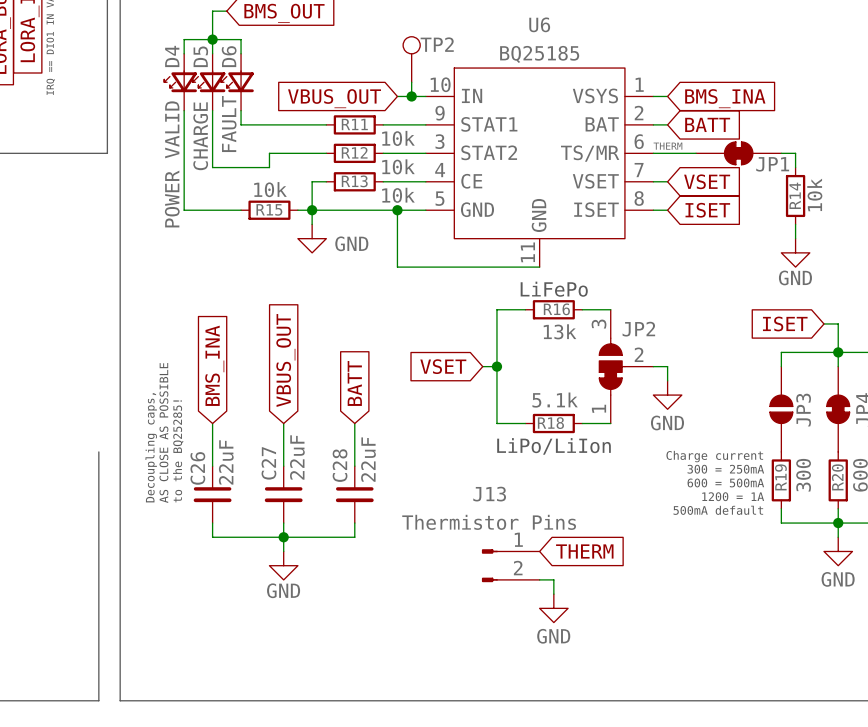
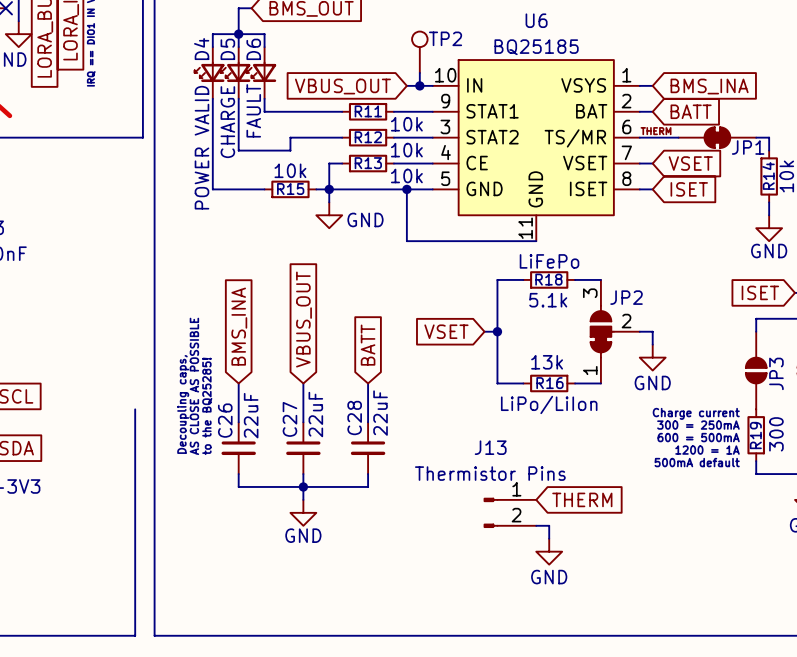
R16 name: R16 (556, 309) -> R18 (548, 279)
R16 value: 13k (560, 331) -> 5.1k (548, 300)
R18 value: 5.1k (555, 400) -> 13k (547, 362)
R18 name: R18 (550, 423) -> R16 (549, 383)

